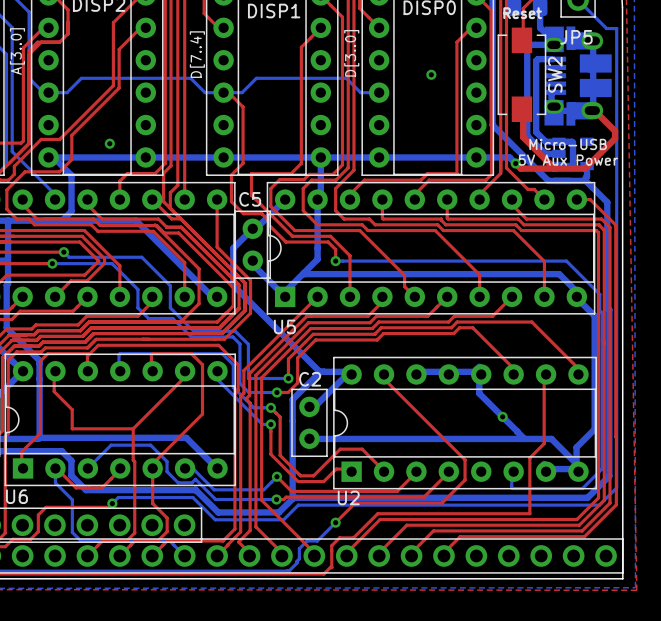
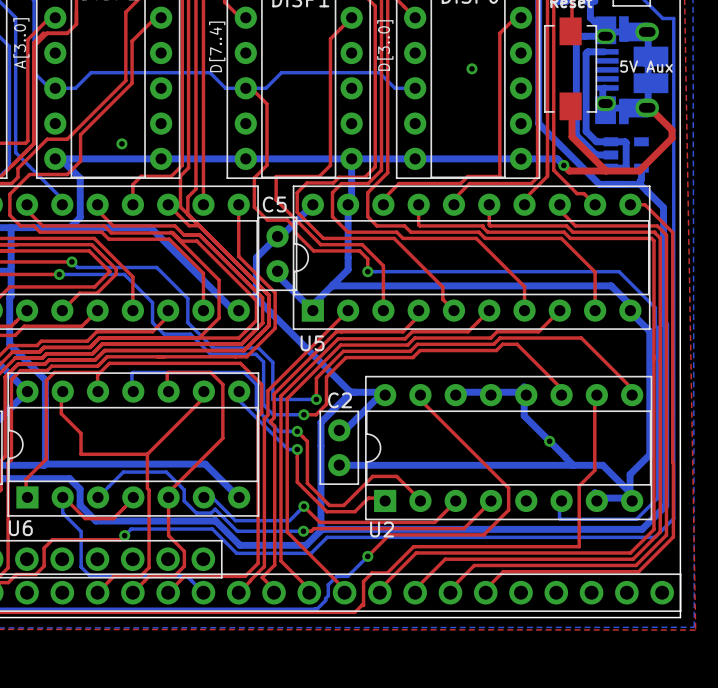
JP5 name: JP5 (576, 37) -> none
text: none -> 5V Aux (646, 66)
SW2 name: SW2 (555, 74) -> none
text: Micro-USB (568, 144) -> none
text: 5V Aux Power (568, 160) -> none

